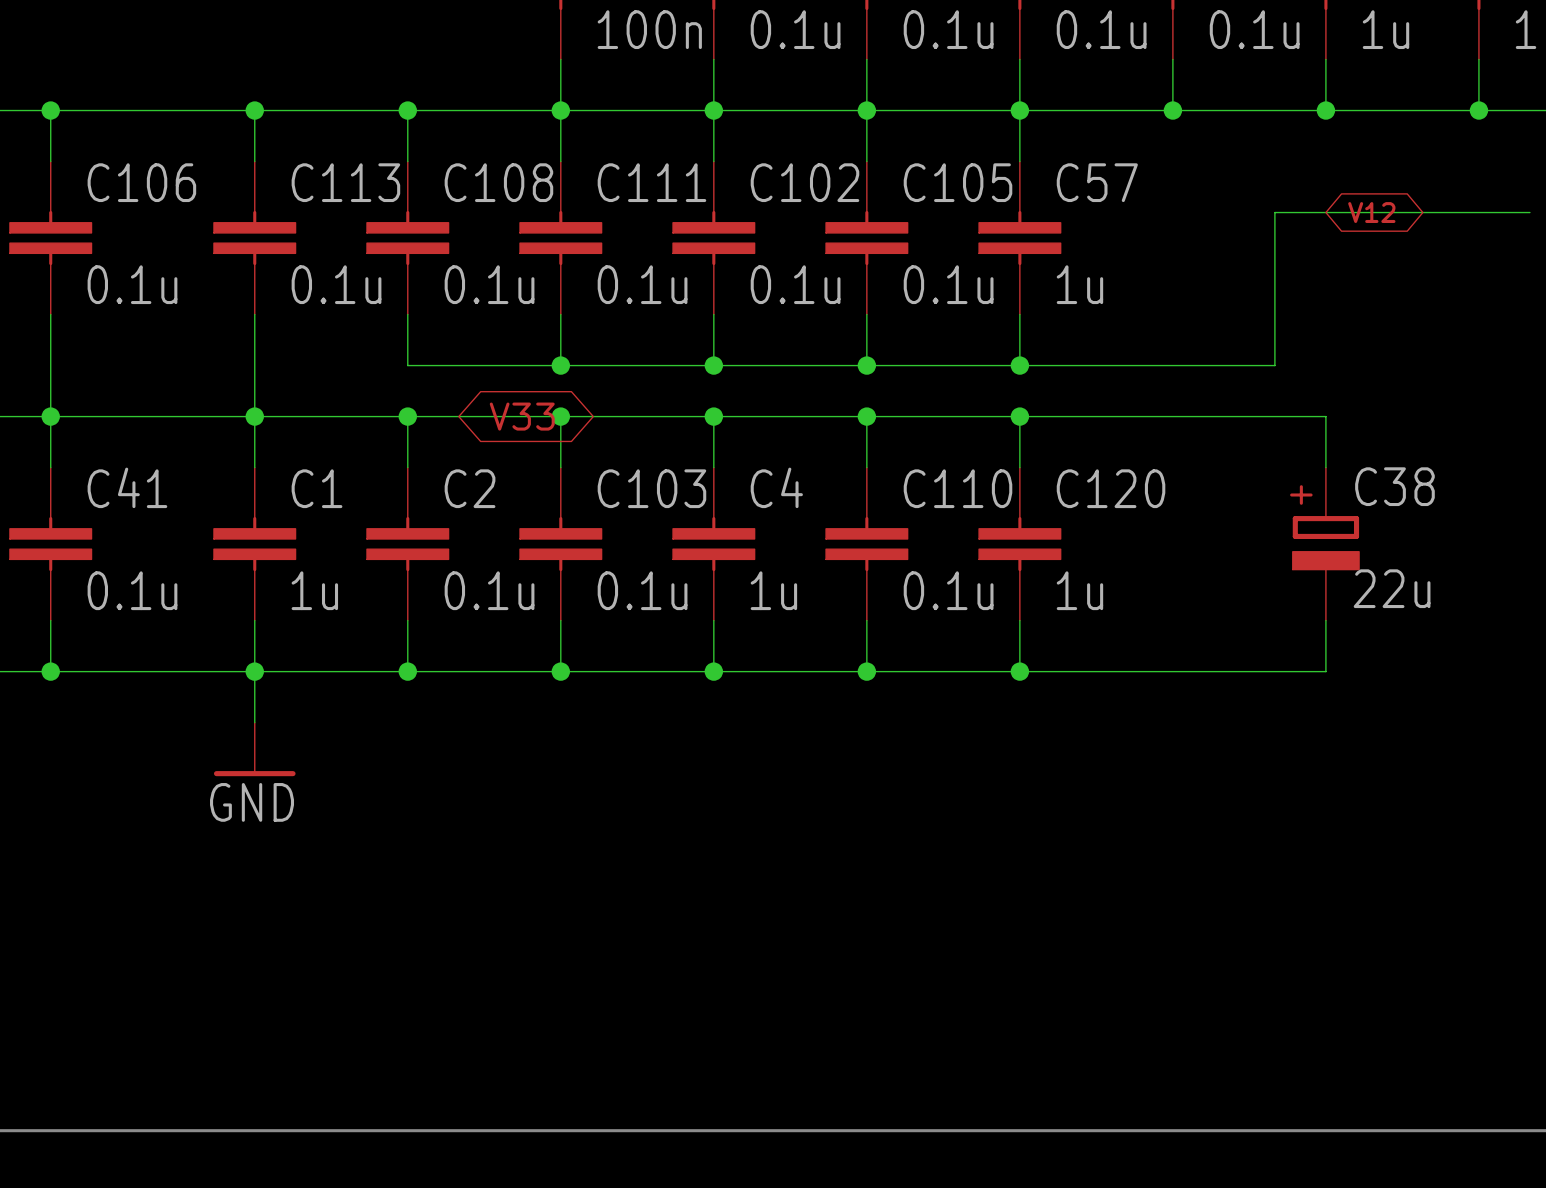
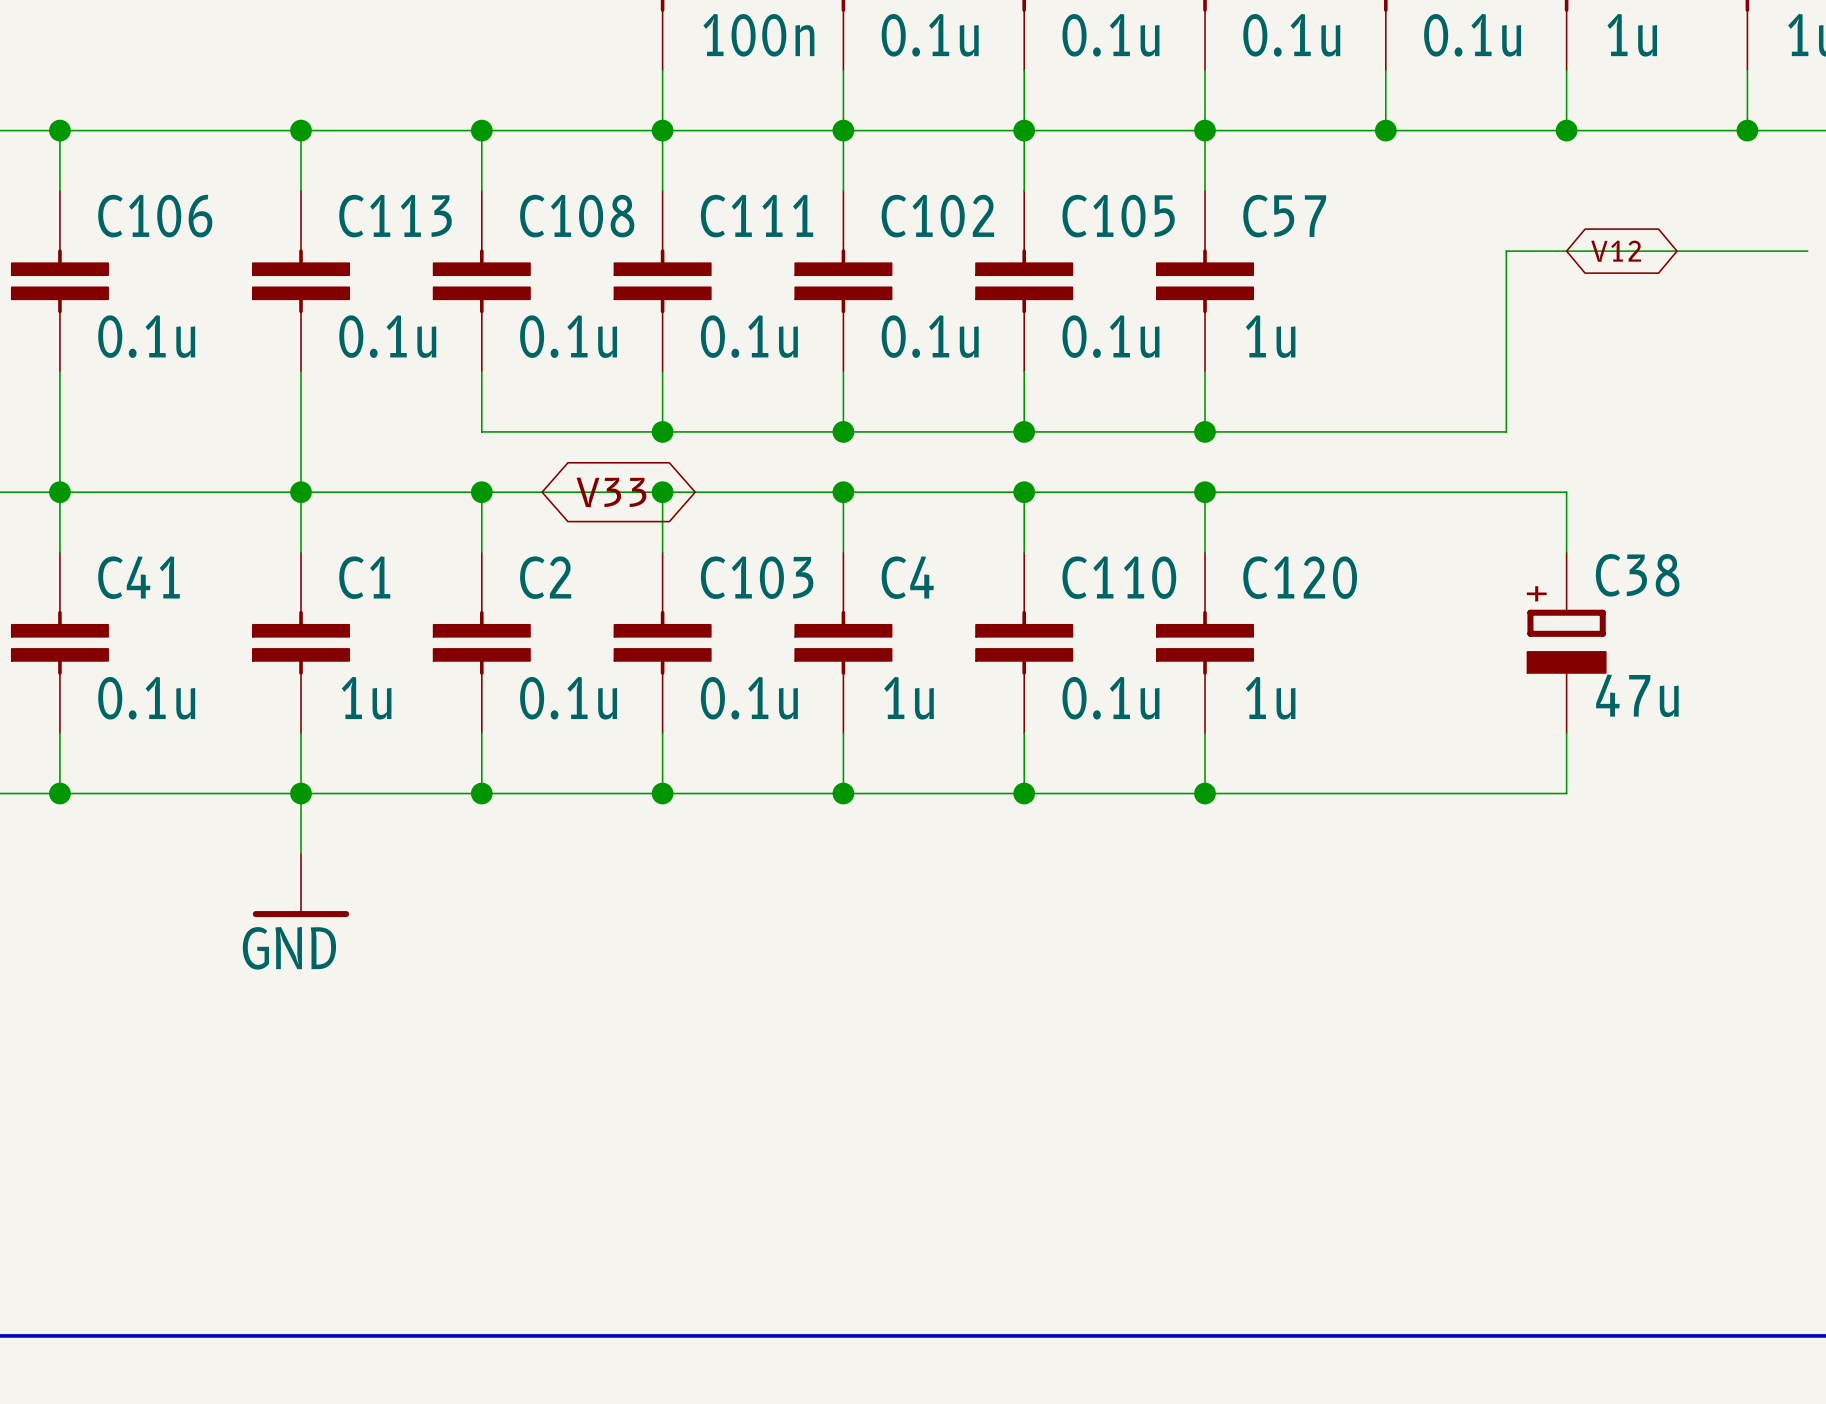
C38 value: 22u (1392, 588) -> 47u (1637, 695)

